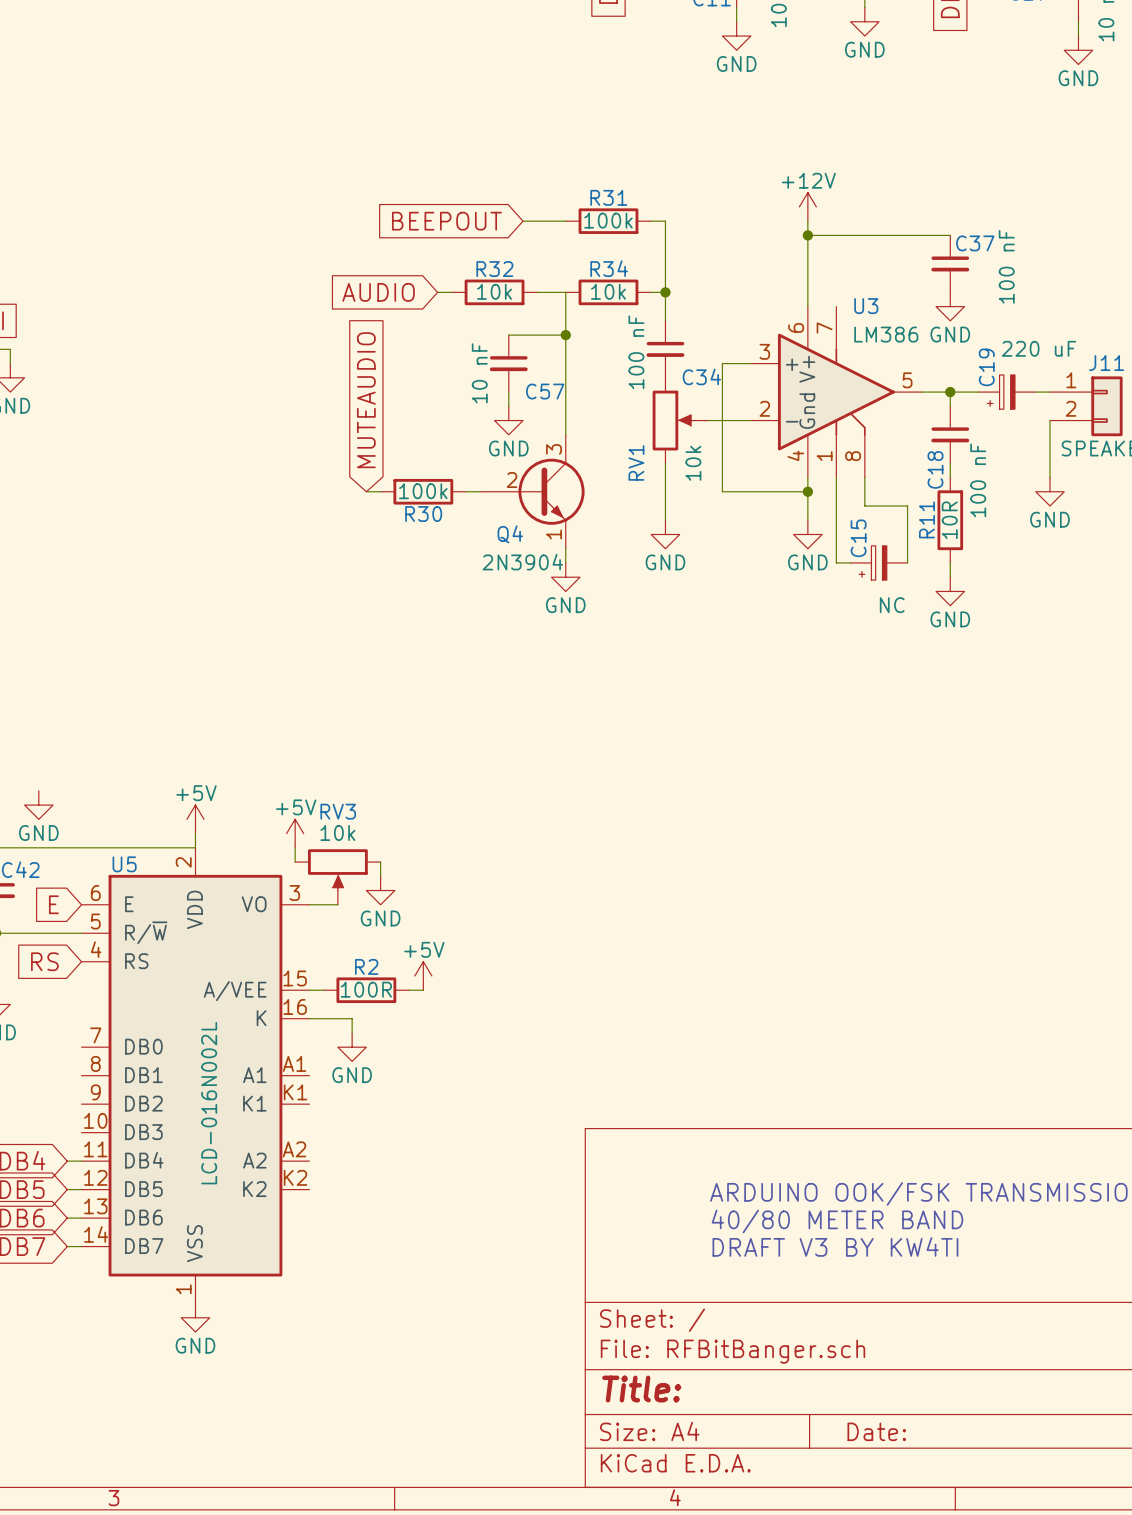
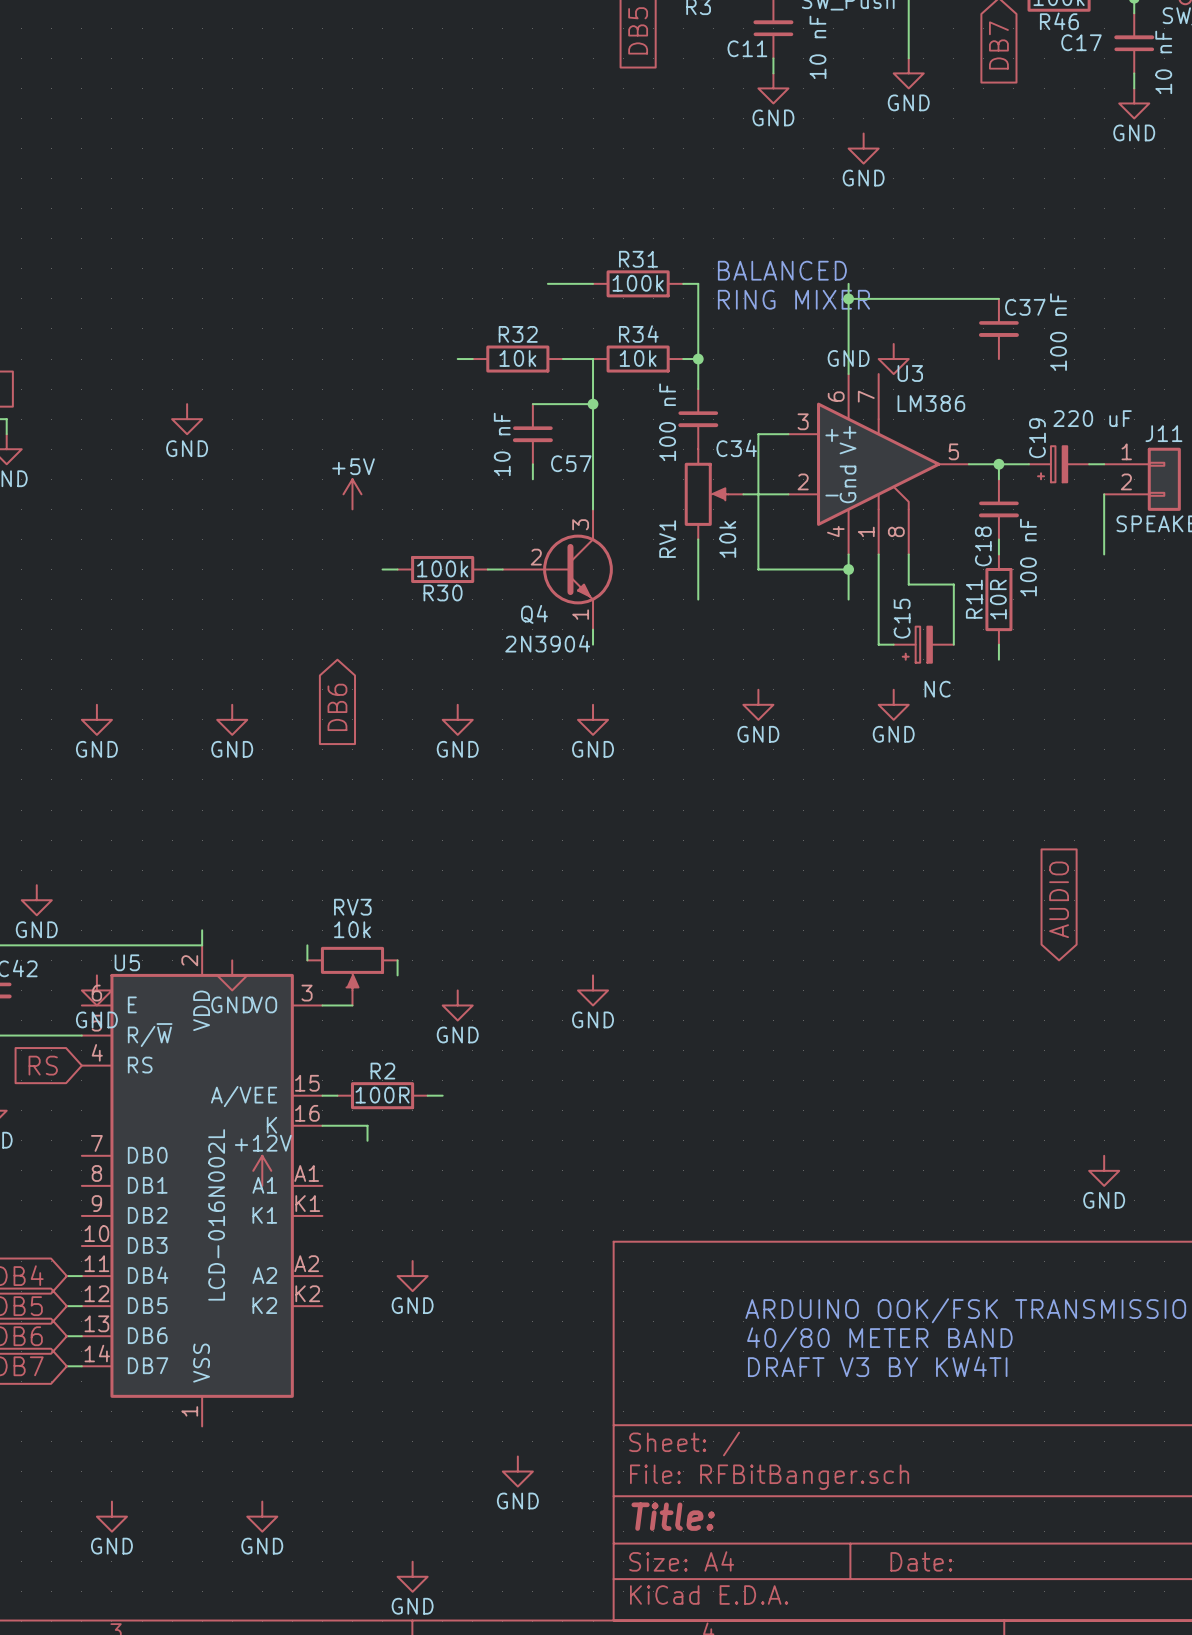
power symbol: none -> GND (863, 148)
power symbol: +12V (807, 206) -> none
text: none -> BALANCED (782, 270)
global label: BEEPOUT (446, 221) -> none
text: none -> RING MIXER (793, 299)
global label: AUDIO (378, 292) -> none
power symbol position: GND (950, 306) -> GND (893, 359)
power symbol text position: GND (950, 334) -> GND (848, 358)
power symbol: none -> GND (187, 419)
global label: MUTEAUDIO (366, 400) -> none
power symbol: none -> +5V (352, 494)
power symbol: GND (508, 420) -> none
power symbol: GND (1049, 491) -> none
power symbol: GND (665, 534) -> none
power symbol: GND (807, 534) -> none
power symbol position: GND (565, 577) -> GND (593, 719)
power symbol: GND (950, 591) -> none
power symbol: none -> GND (758, 704)
power symbol: none -> GND (893, 704)
global label: none -> DB6 (337, 707)
power symbol: none -> GND (96, 719)
power symbol: none -> GND (232, 719)
power symbol: none -> GND (457, 719)
global label: none -> AUDIO (1059, 899)
power symbol: +5V (195, 819) -> none
power symbol: +5V (295, 833) -> none
power symbol: none -> GND (232, 975)
power symbol: none -> GND (96, 990)
power symbol position: GND (380, 890) -> GND (457, 1005)
power symbol: none -> GND (593, 990)
global label: E (53, 904) -> none
power symbol: +5V (423, 975) -> none
power symbol: GND (352, 1047) -> none
power symbol: none -> +12V (262, 1170)
power symbol: none -> GND (1104, 1170)
power symbol: none -> GND (412, 1276)
power symbol: GND (195, 1317) -> none
power symbol: none -> GND (517, 1471)
power symbol: none -> GND (111, 1516)
power symbol: none -> GND (262, 1516)
power symbol: none -> GND (412, 1576)

